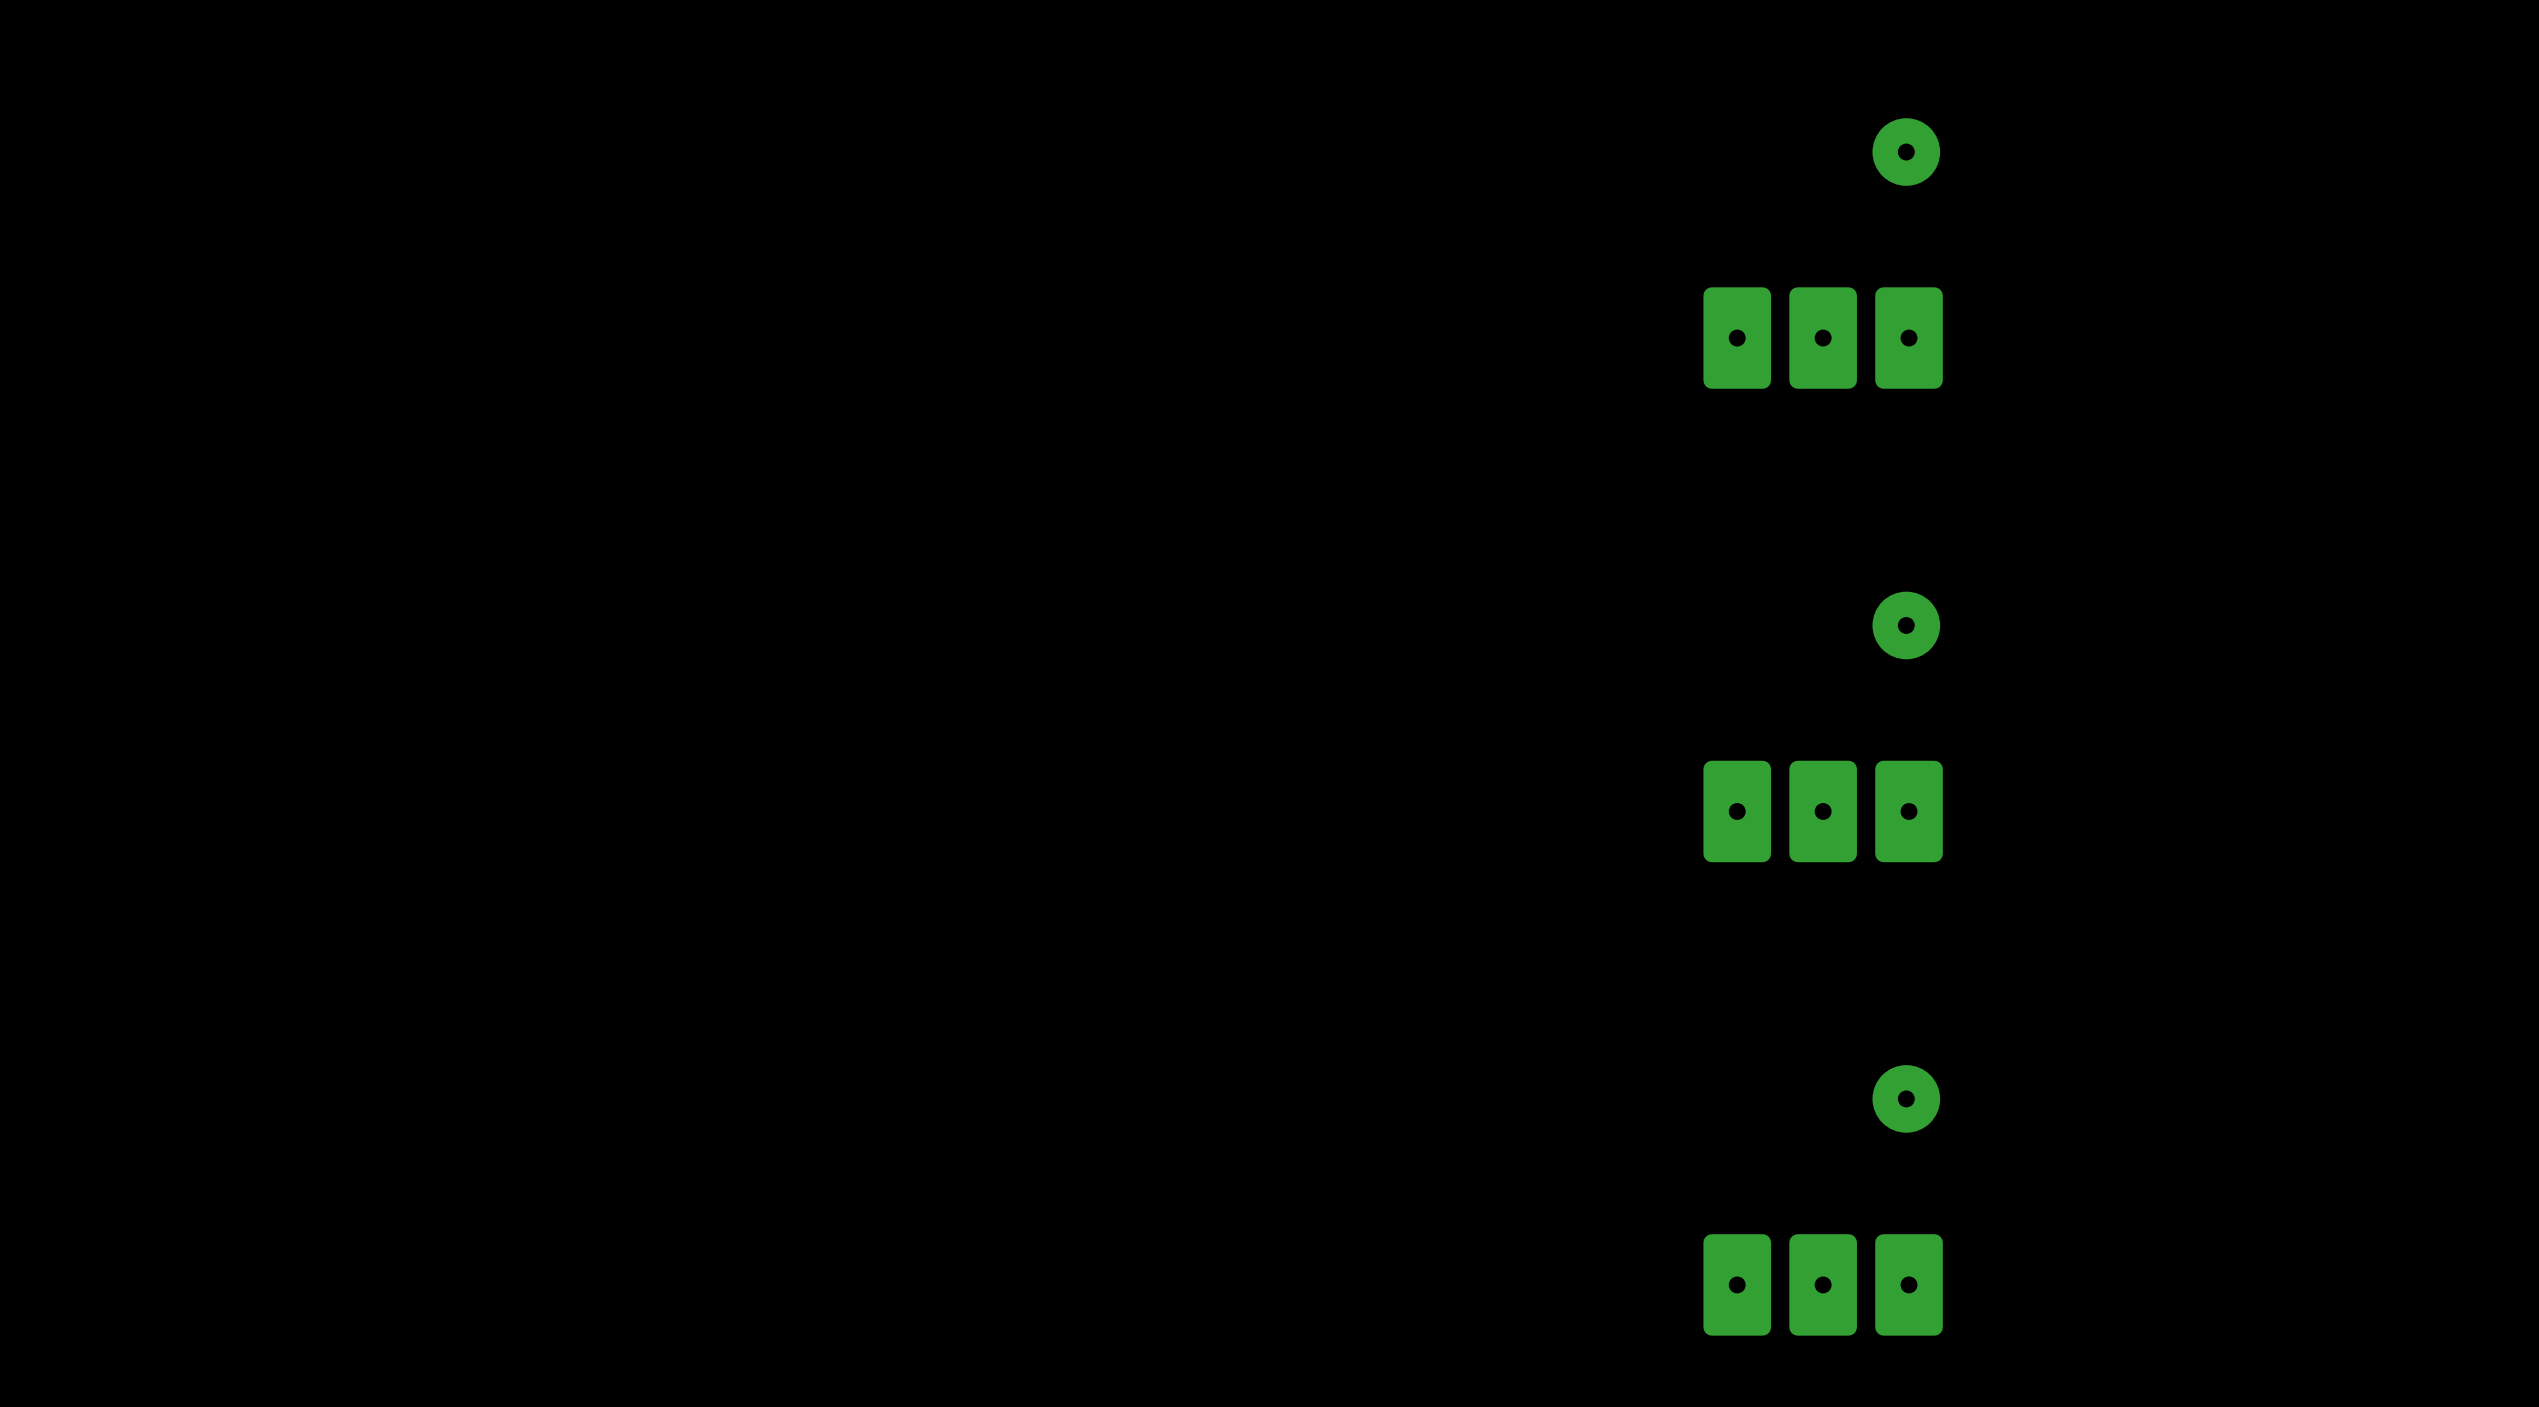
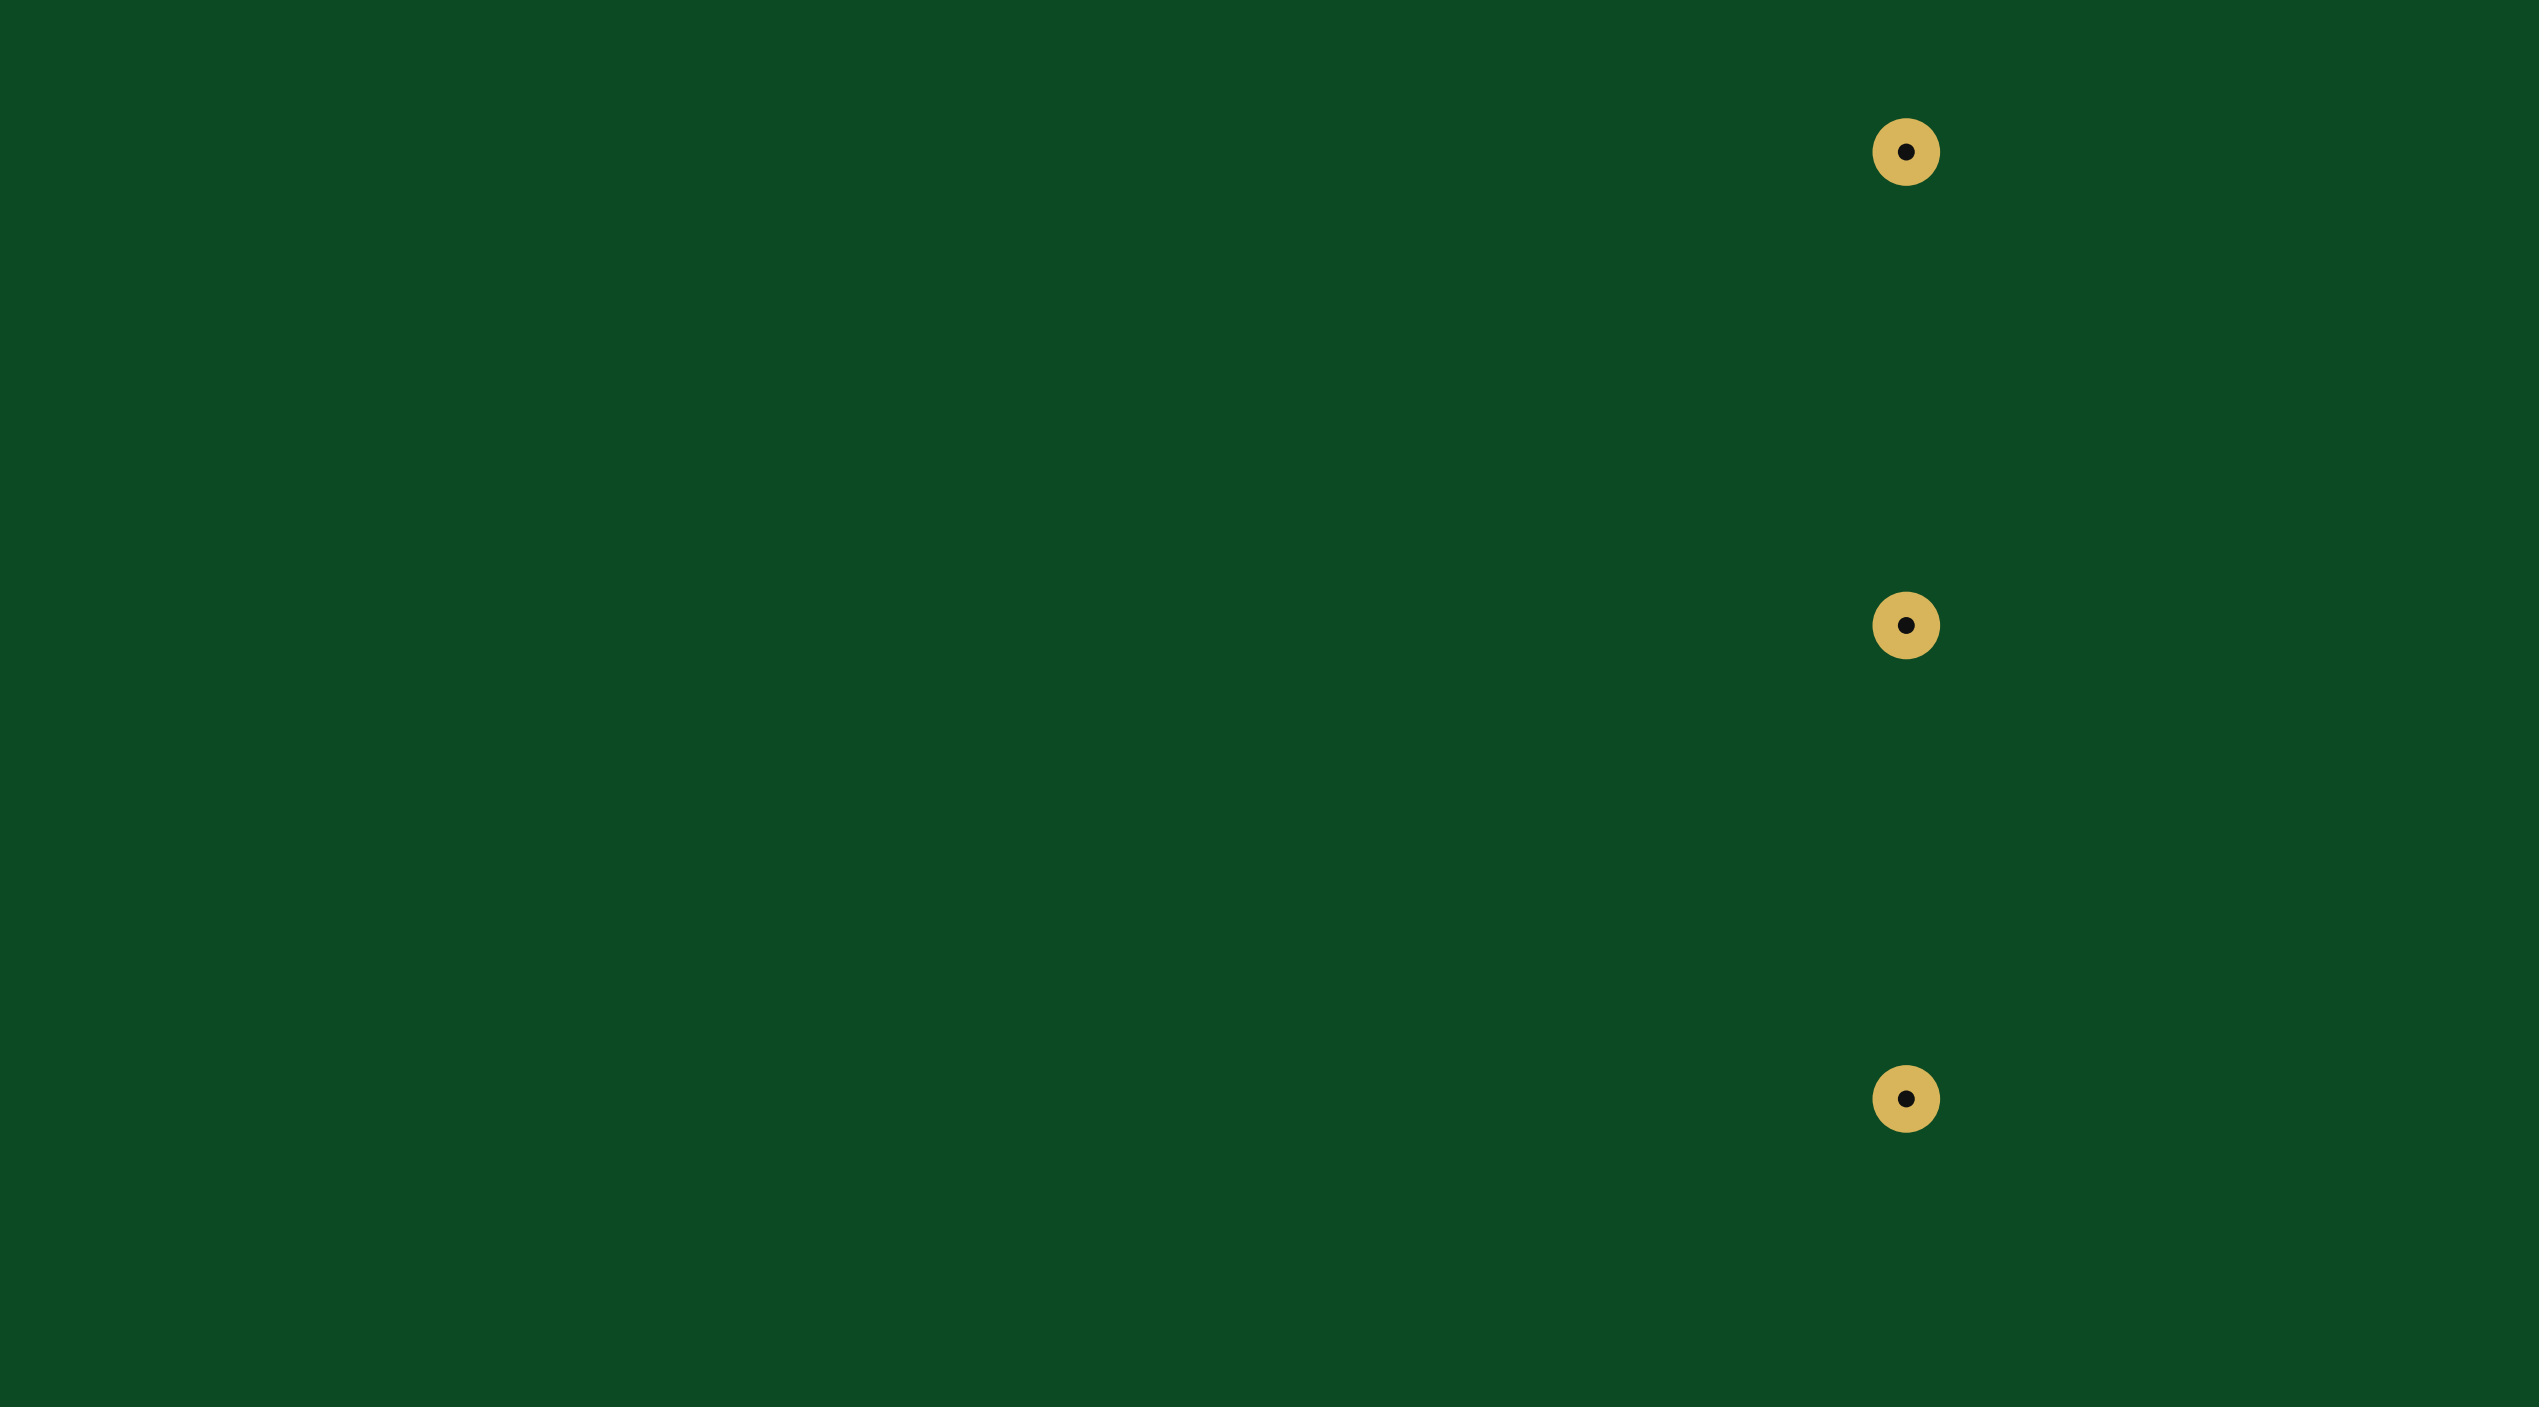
part: (1823, 338) -> none
part: (1823, 811) -> none
part: (1823, 1284) -> none

